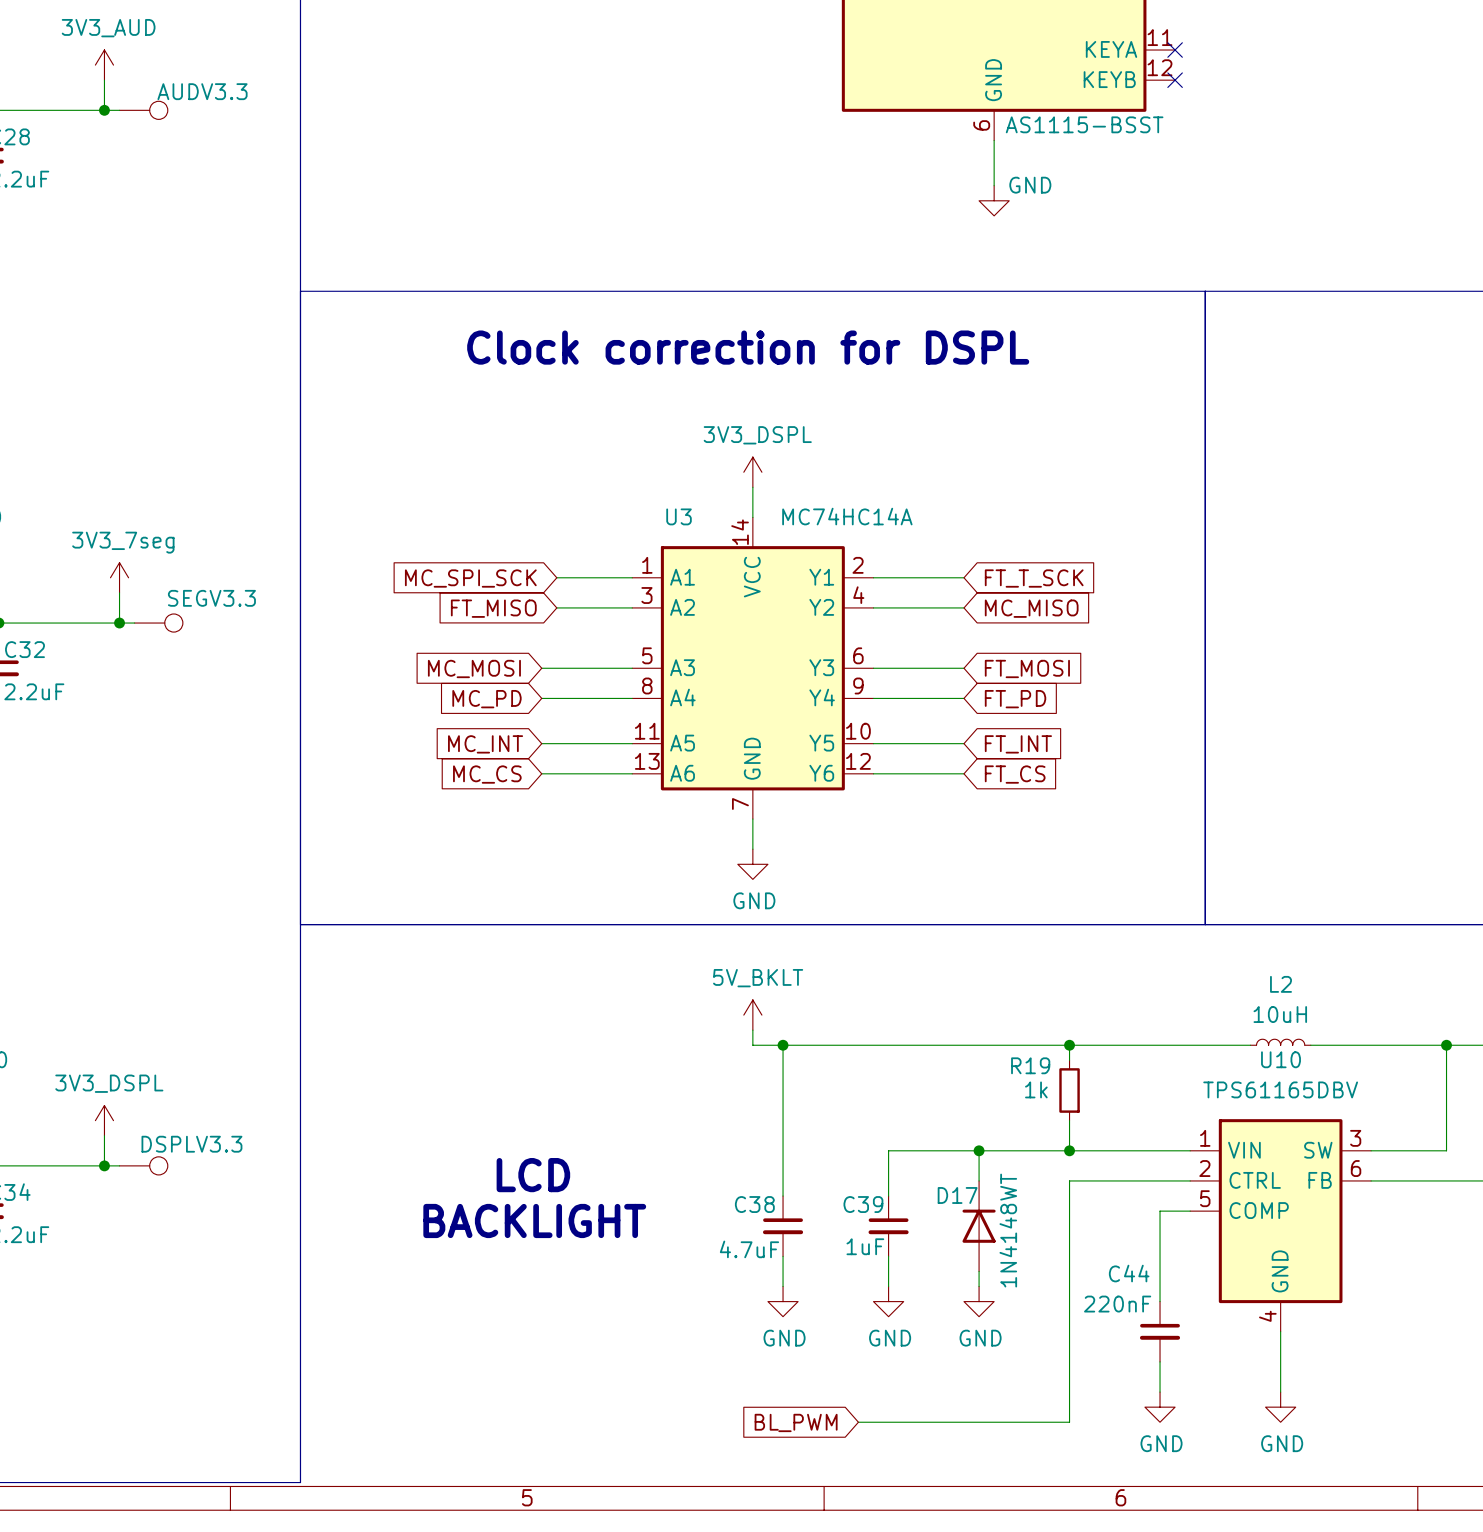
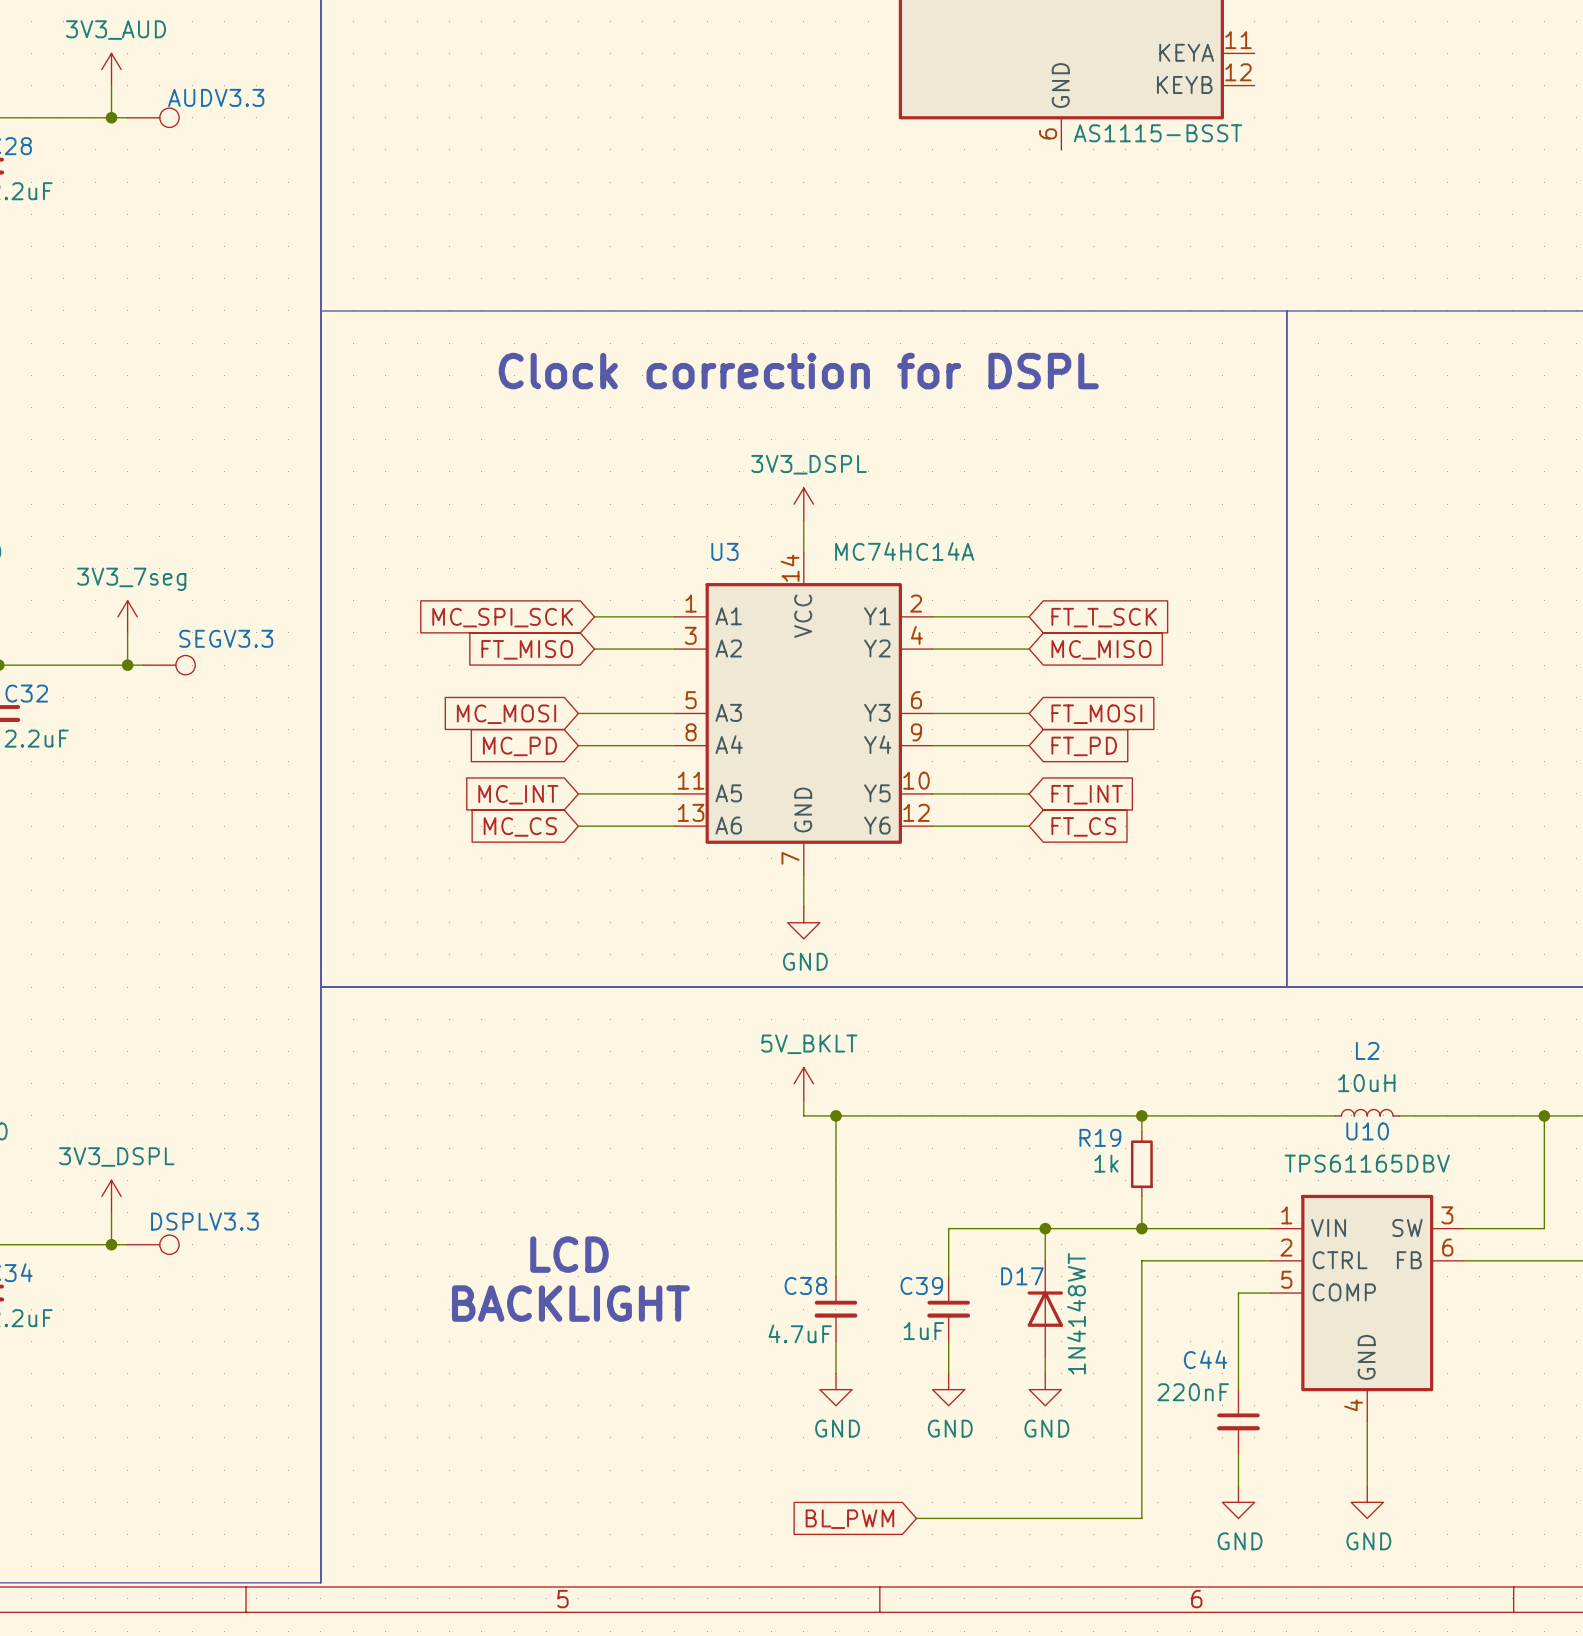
no-connect mark: (1175, 50) -> none
no-connect mark: (1175, 80) -> none
wire: (994, 140) (994, 185) -> none
power symbol: GND (994, 200) -> none

